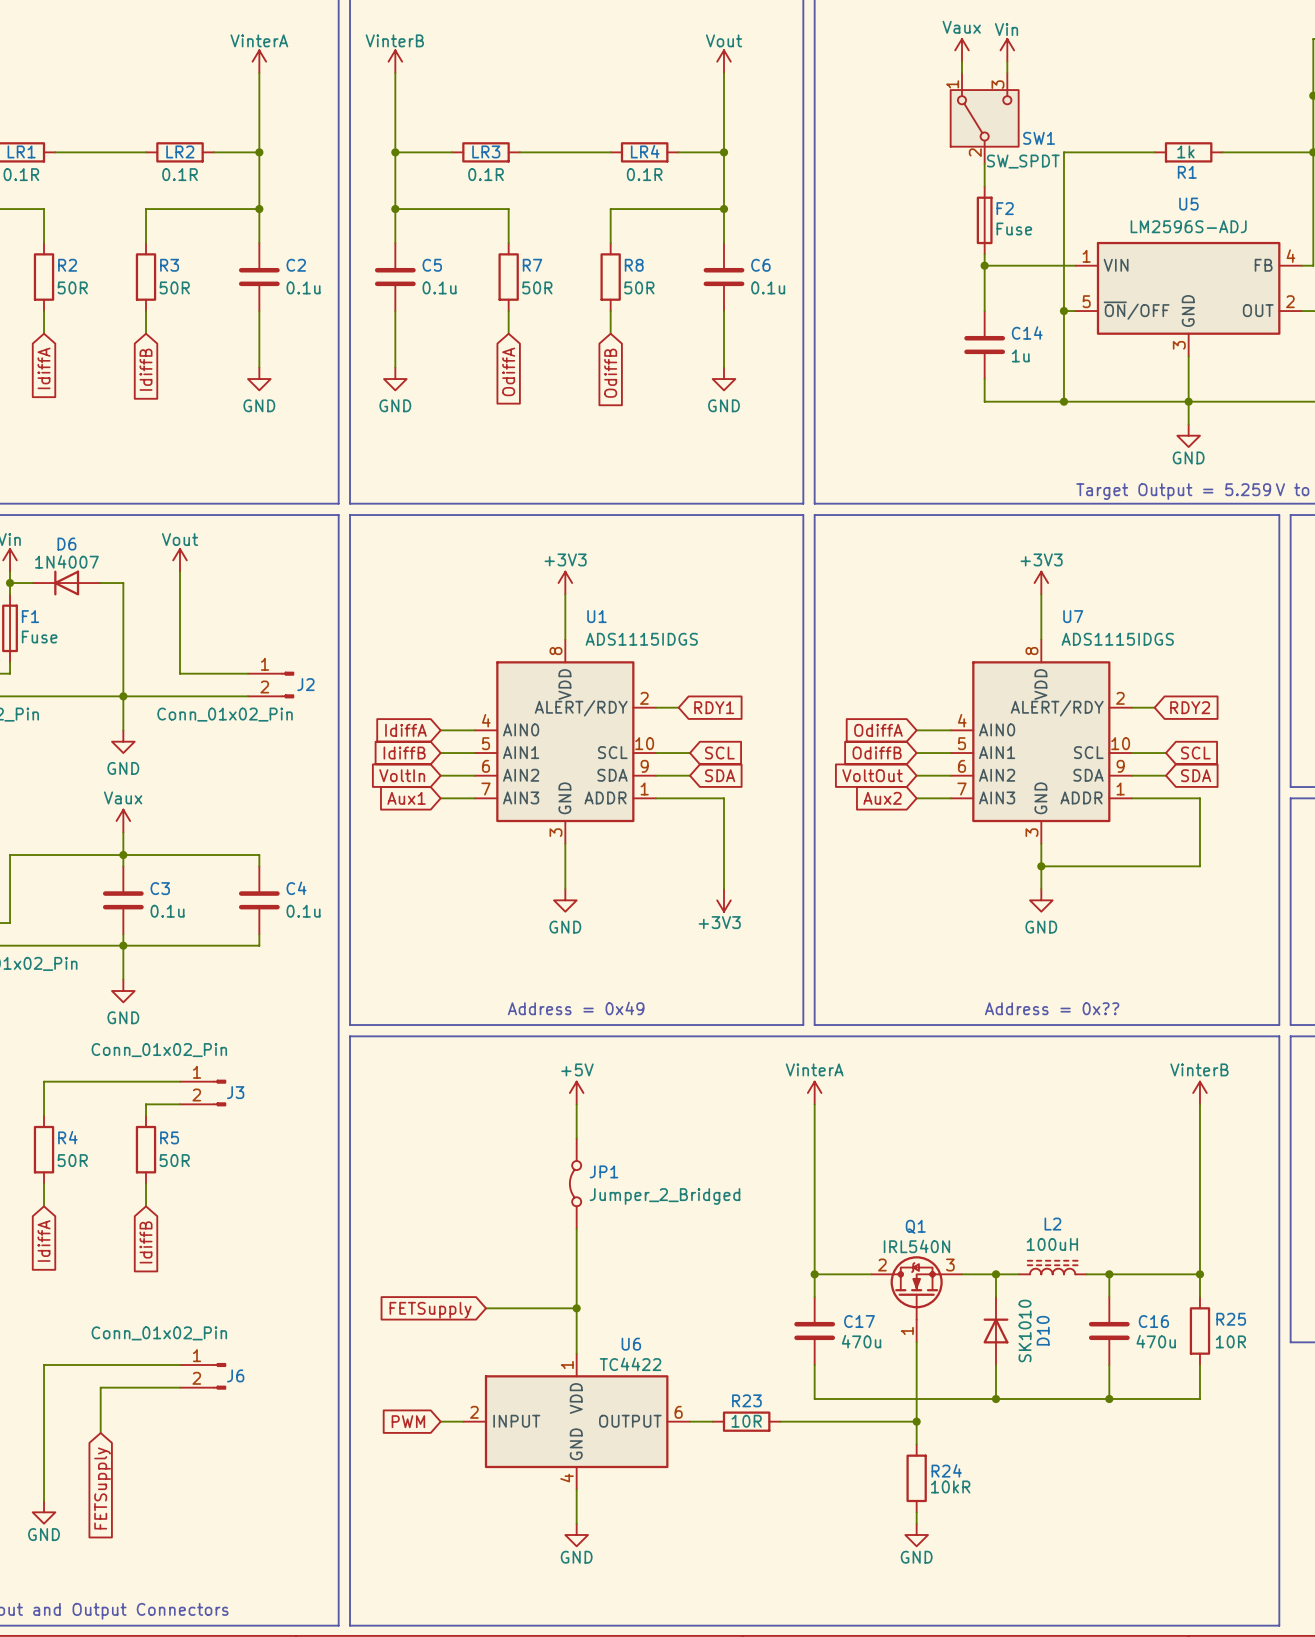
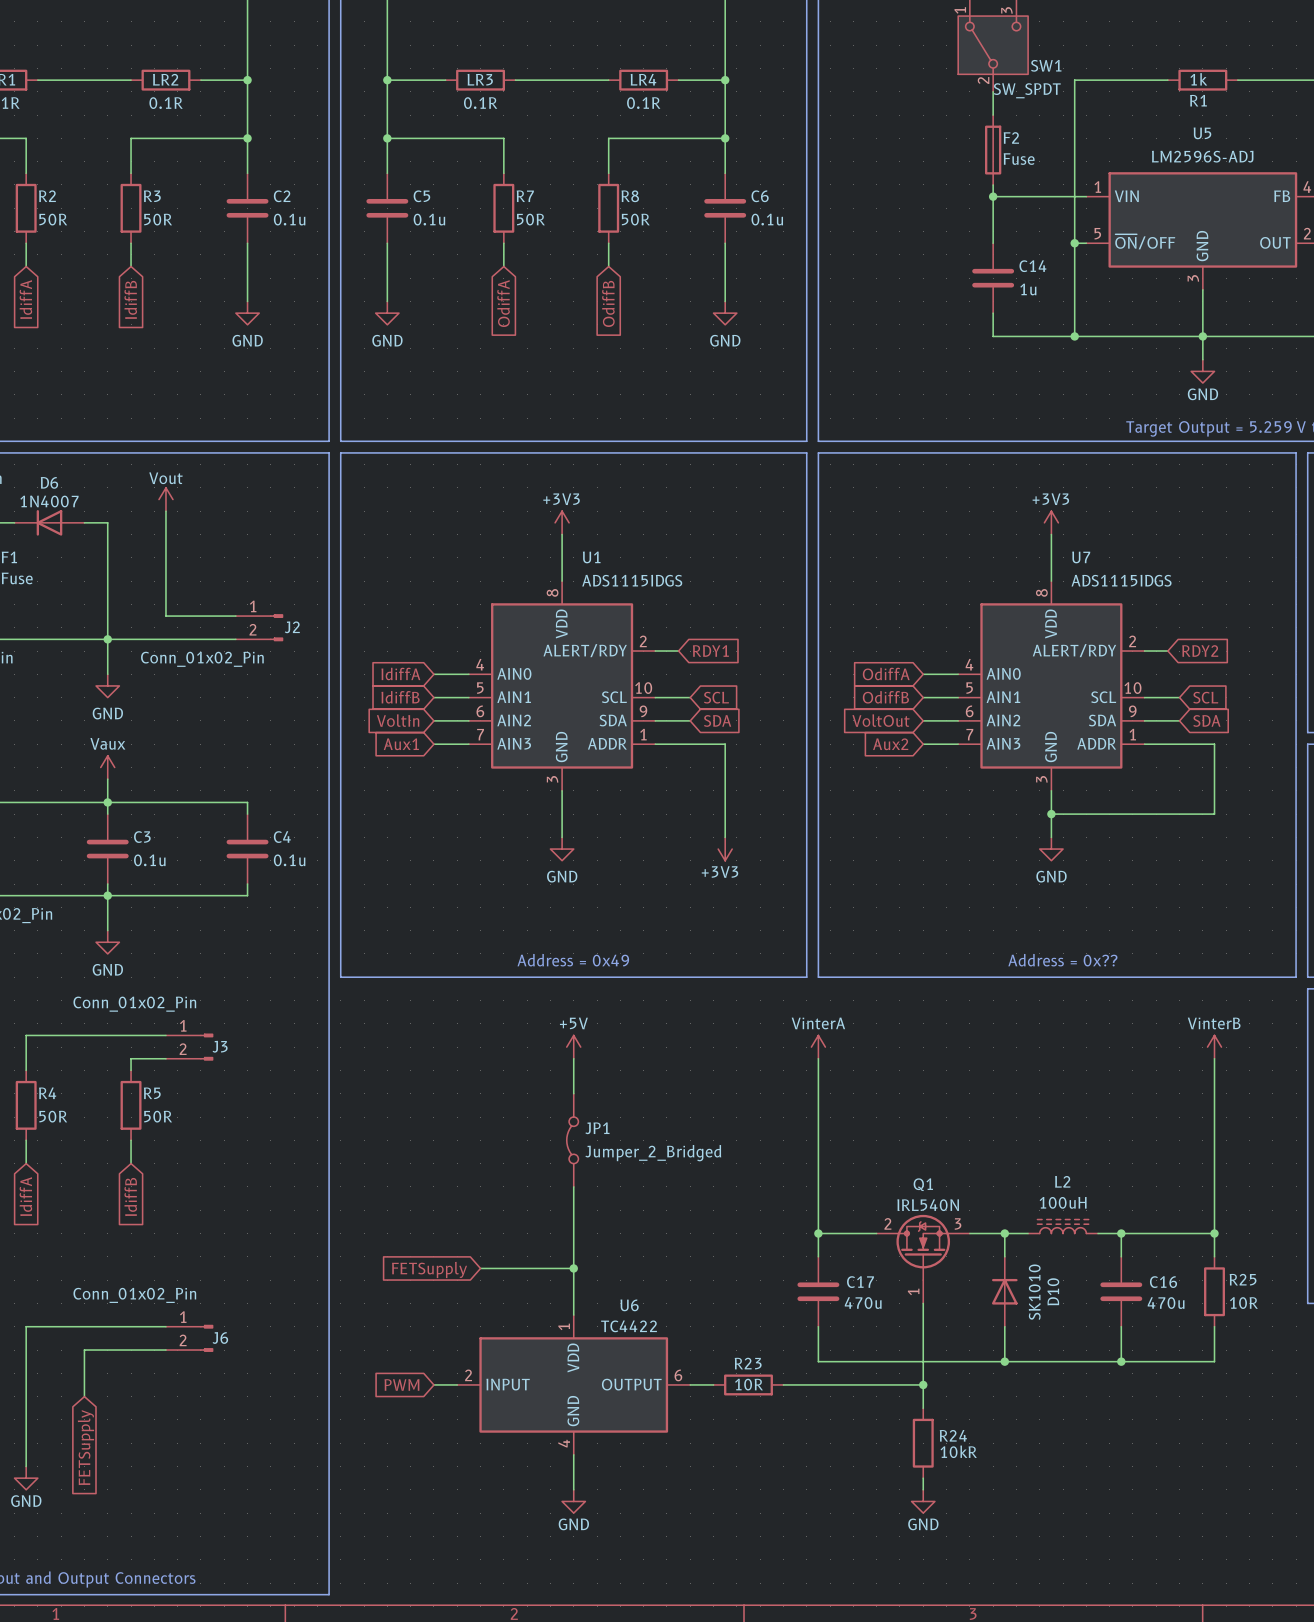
line: (350, 1036) (1279, 1036) (1279, 1625) (350, 1625) (350, 1036) -> none

